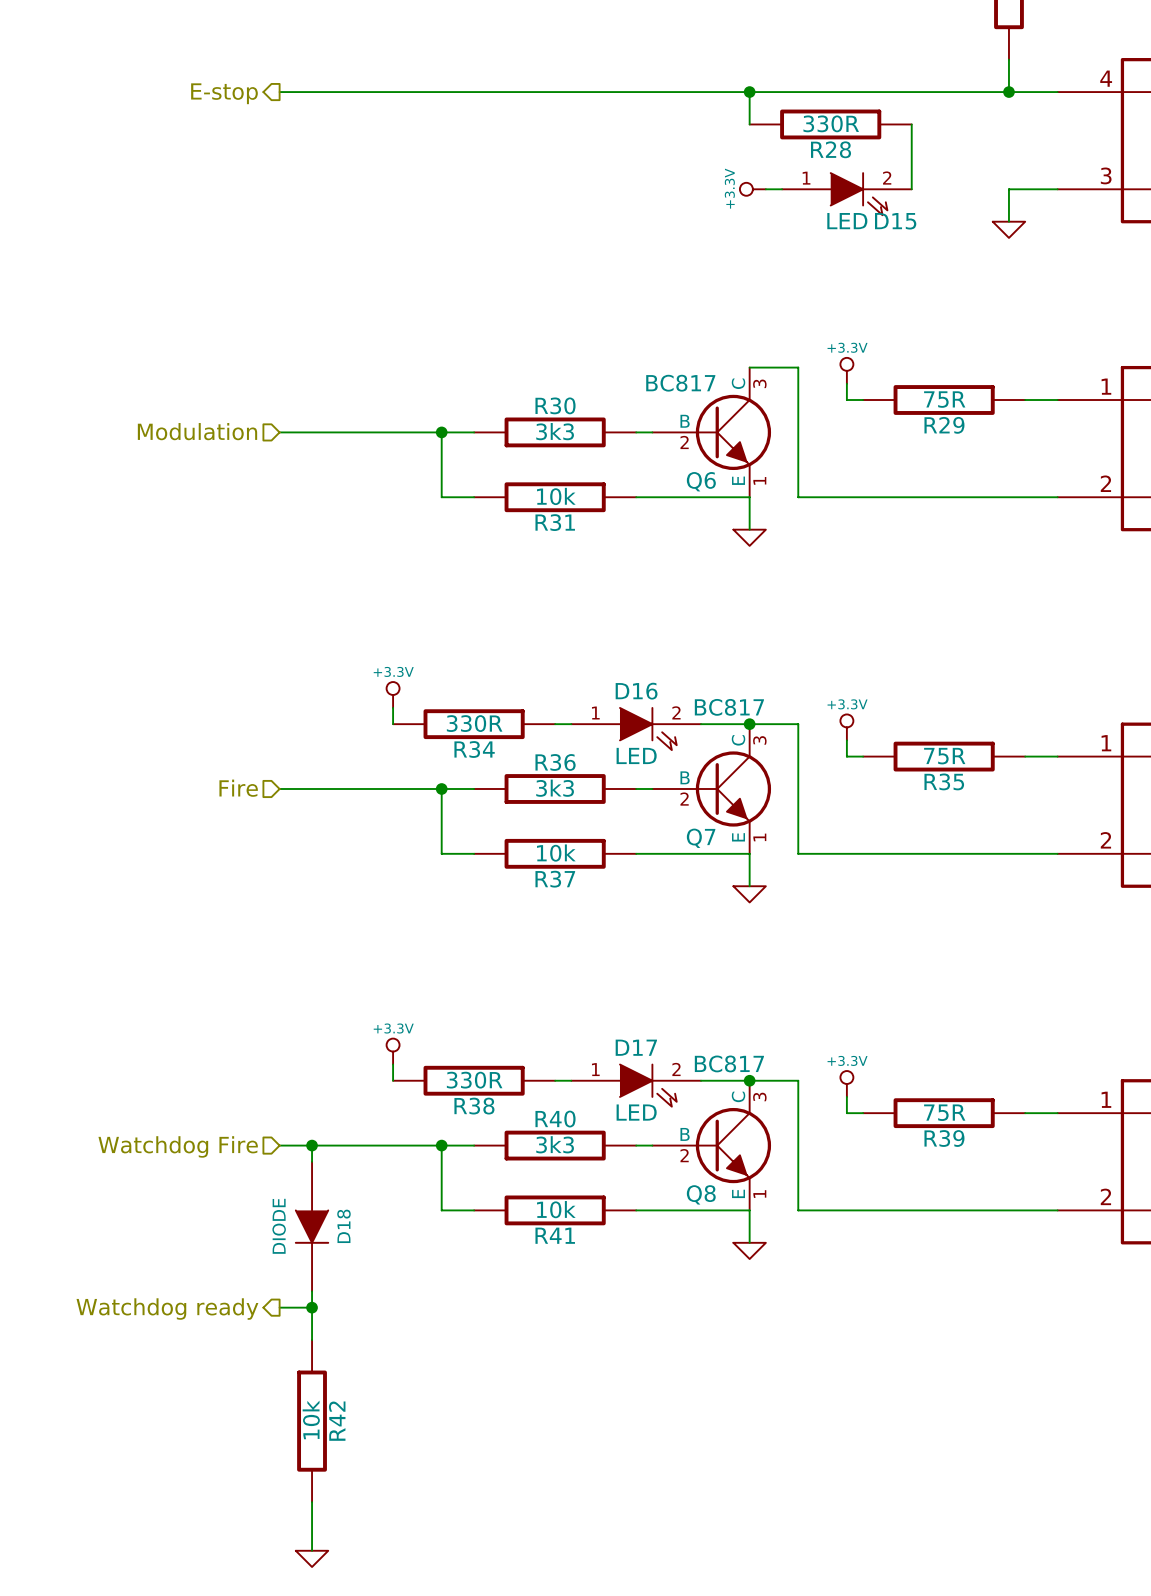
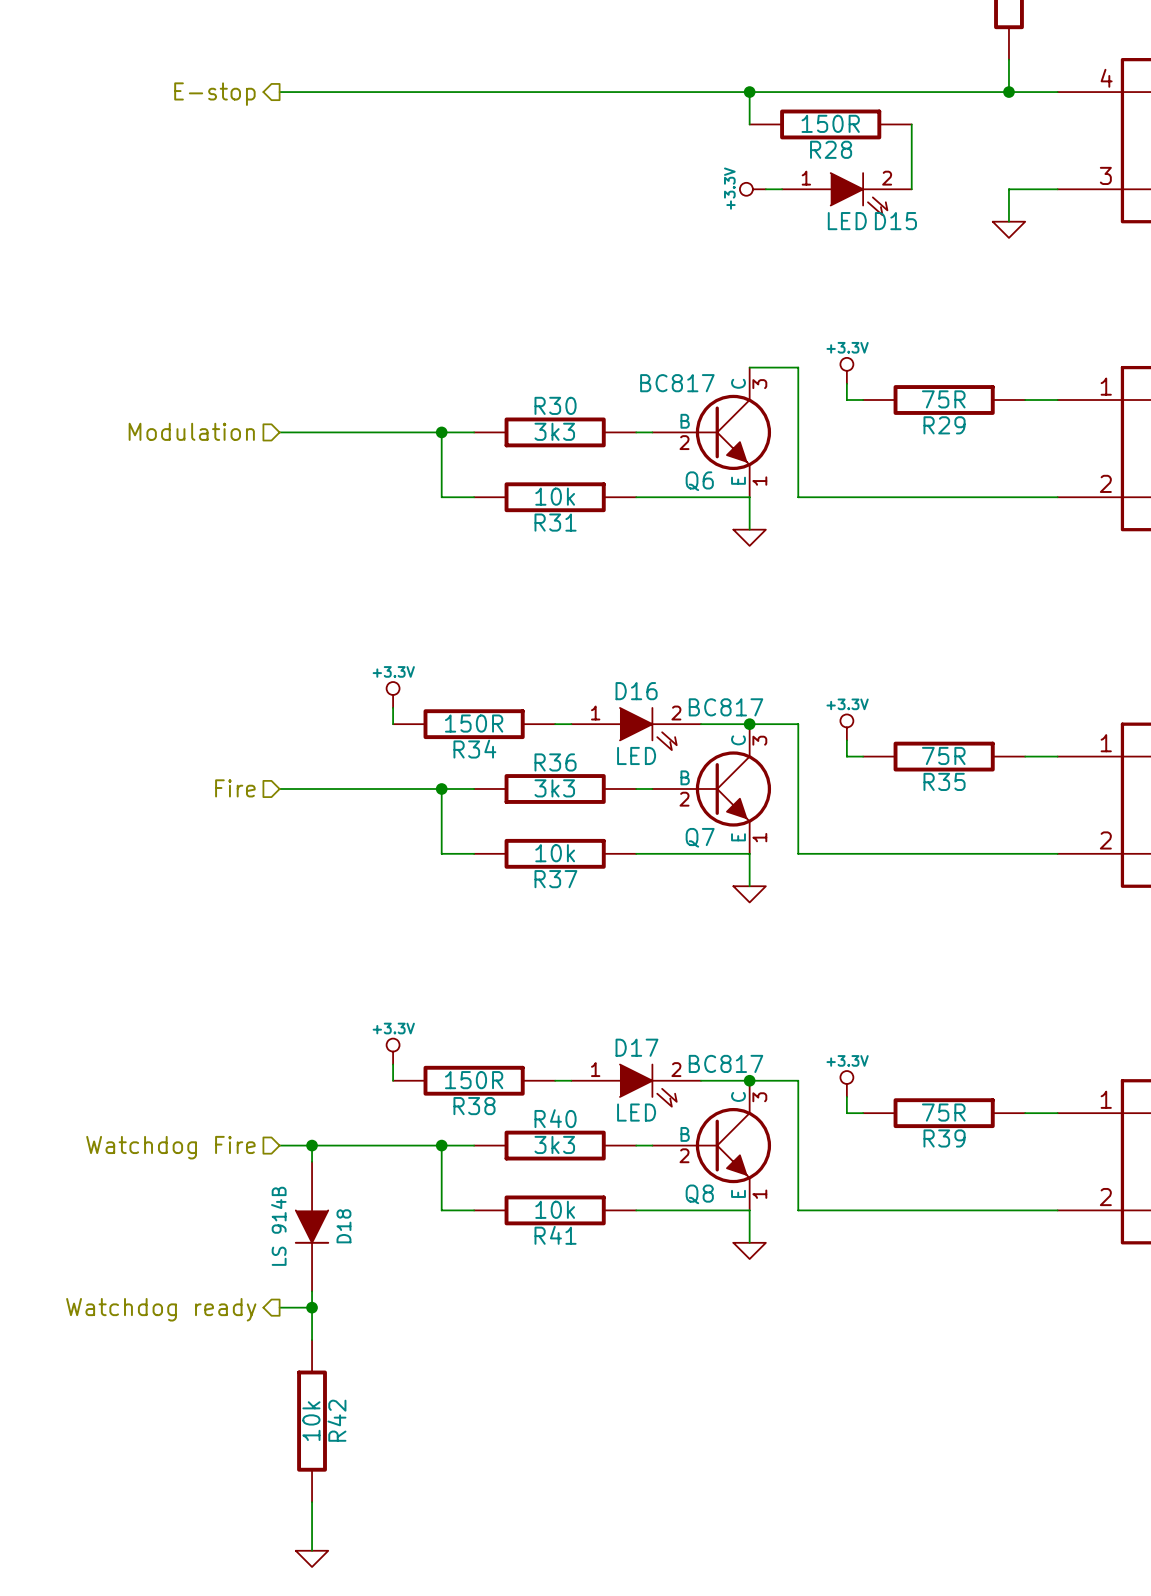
R28 value: 330R (831, 123) -> 150R (830, 123)
R34 value: 330R (474, 723) -> 150R (474, 723)
R38 value: 330R (474, 1080) -> 150R (474, 1080)
D18 value: DIODE (279, 1226) -> LS 914B (278, 1226)

